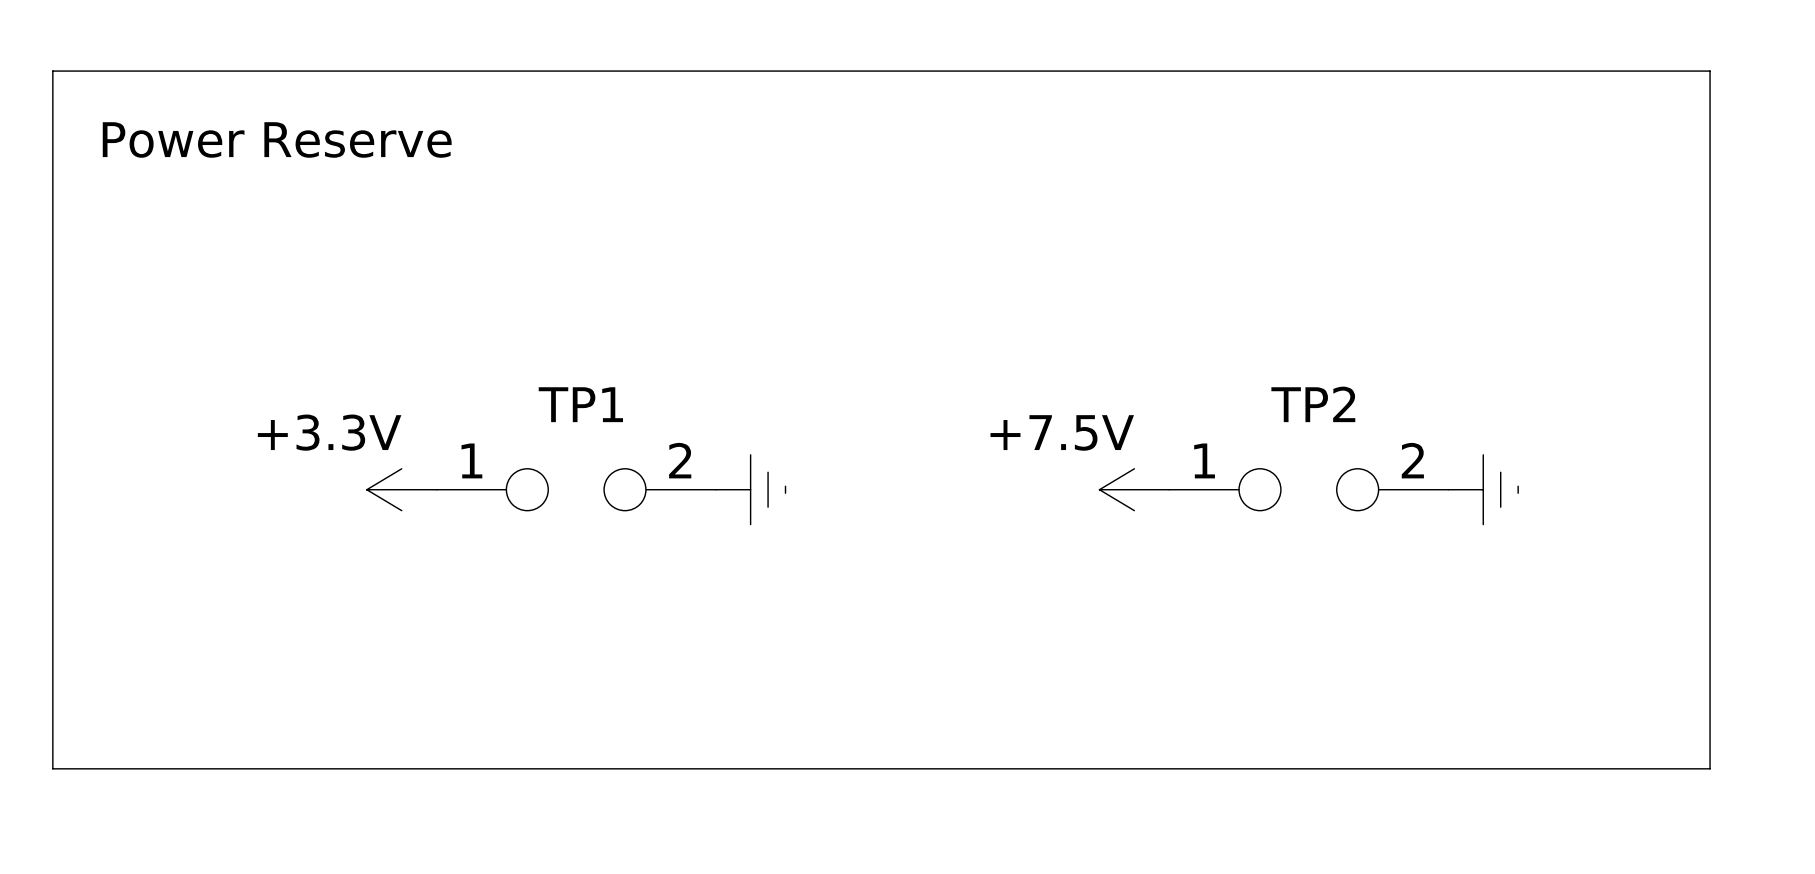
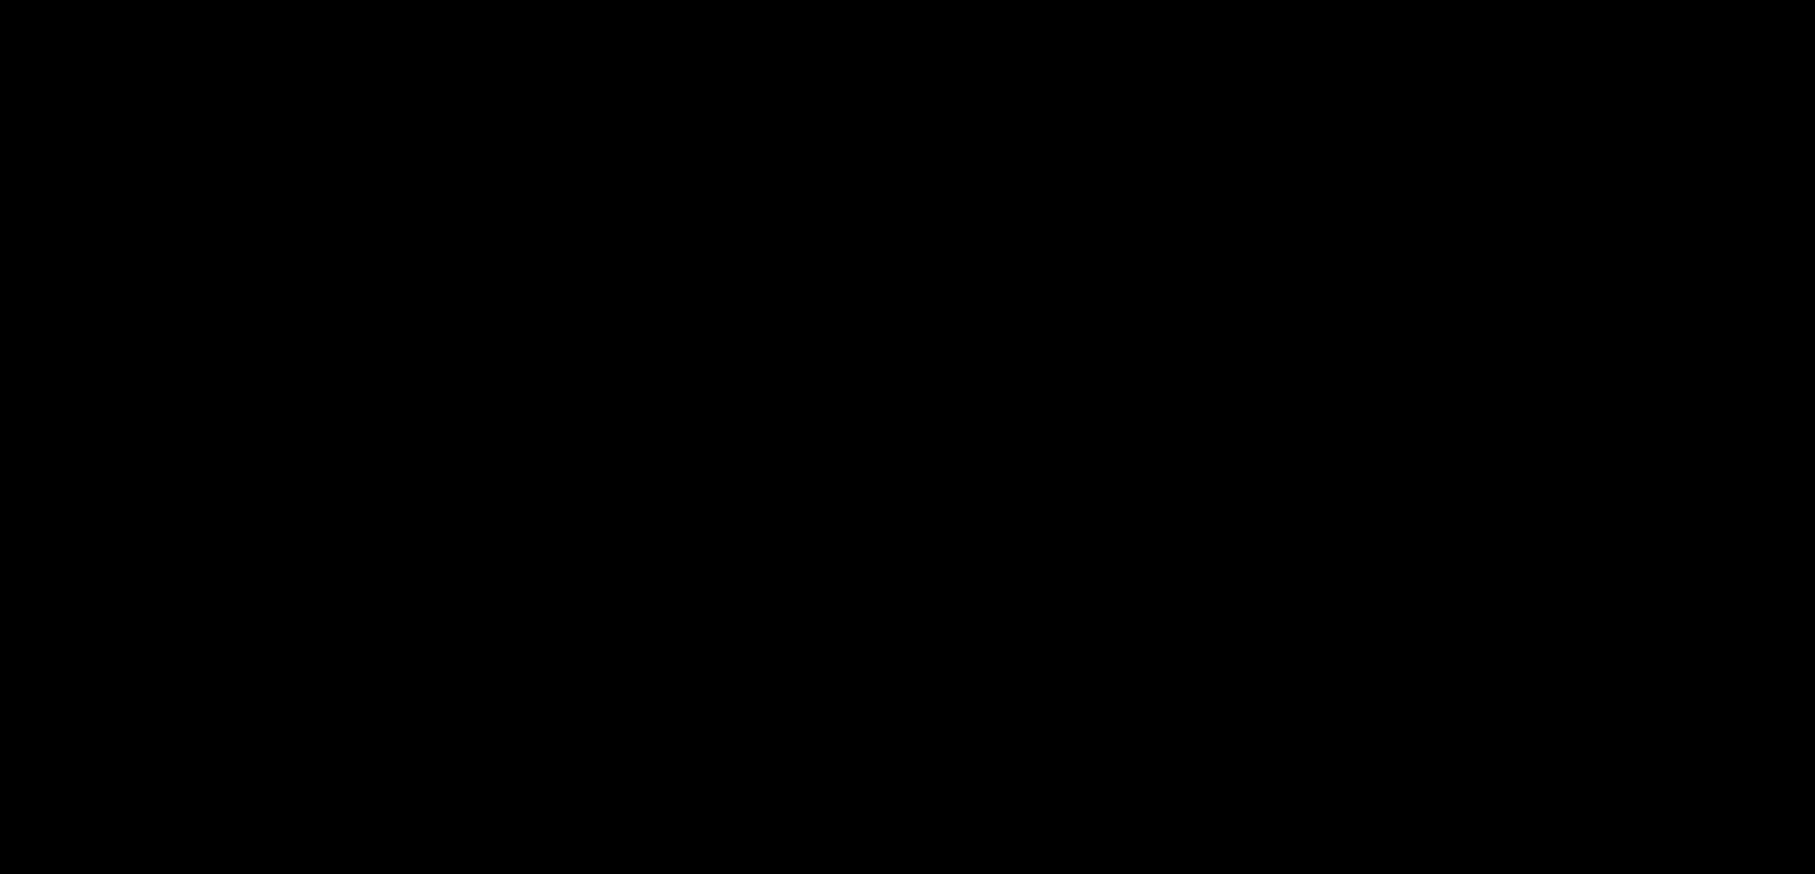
line: (52, 71) (1710, 71) (1710, 768) (52, 768) (52, 71) -> none
text: Power Reserve (277, 139) -> none
power symbol: +3.3V (401, 489) -> none
TP1: (576, 489) -> none
power symbol: (750, 489) -> none
power symbol: +7.5V (1134, 489) -> none
TP2: (1308, 489) -> none
power symbol: (1483, 489) -> none

